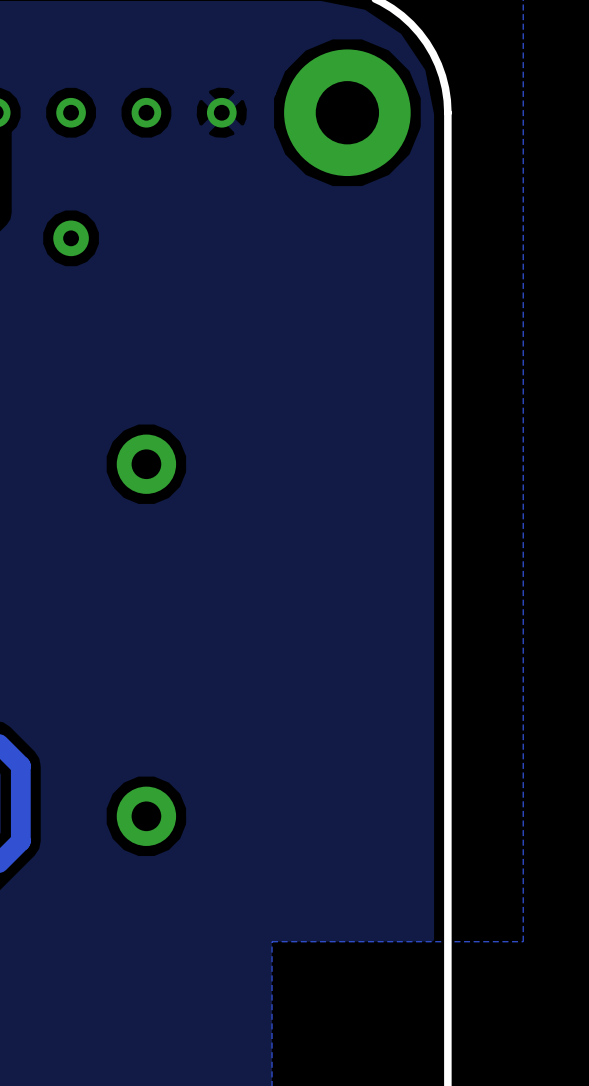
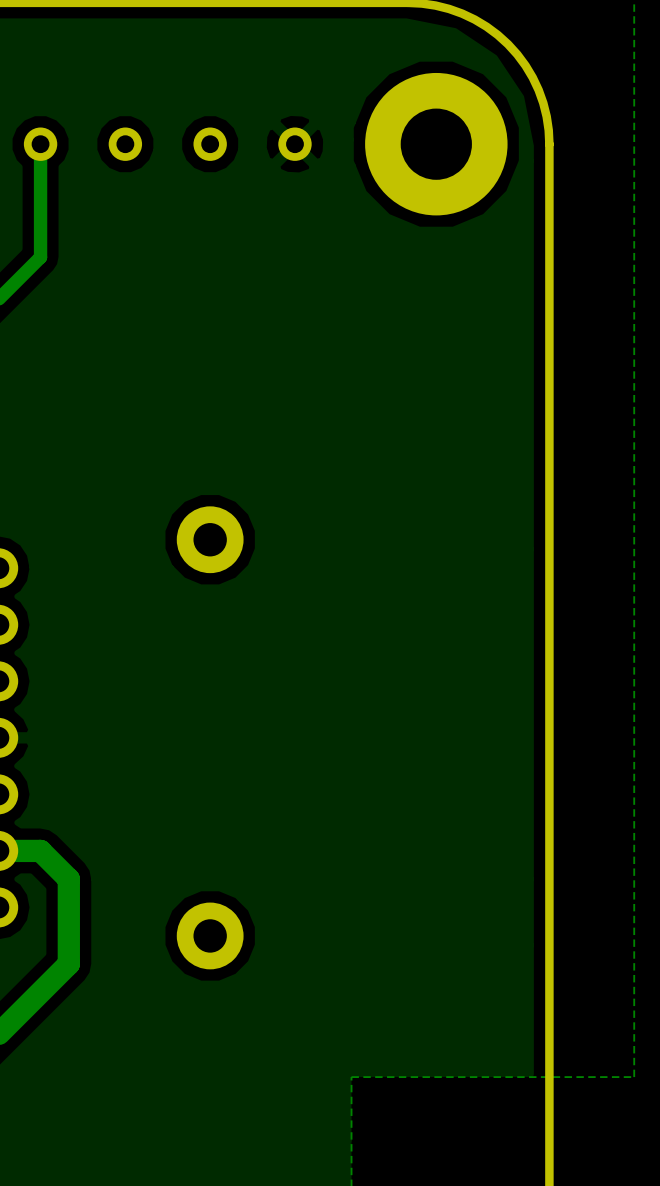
via: (71, 238) -> none

